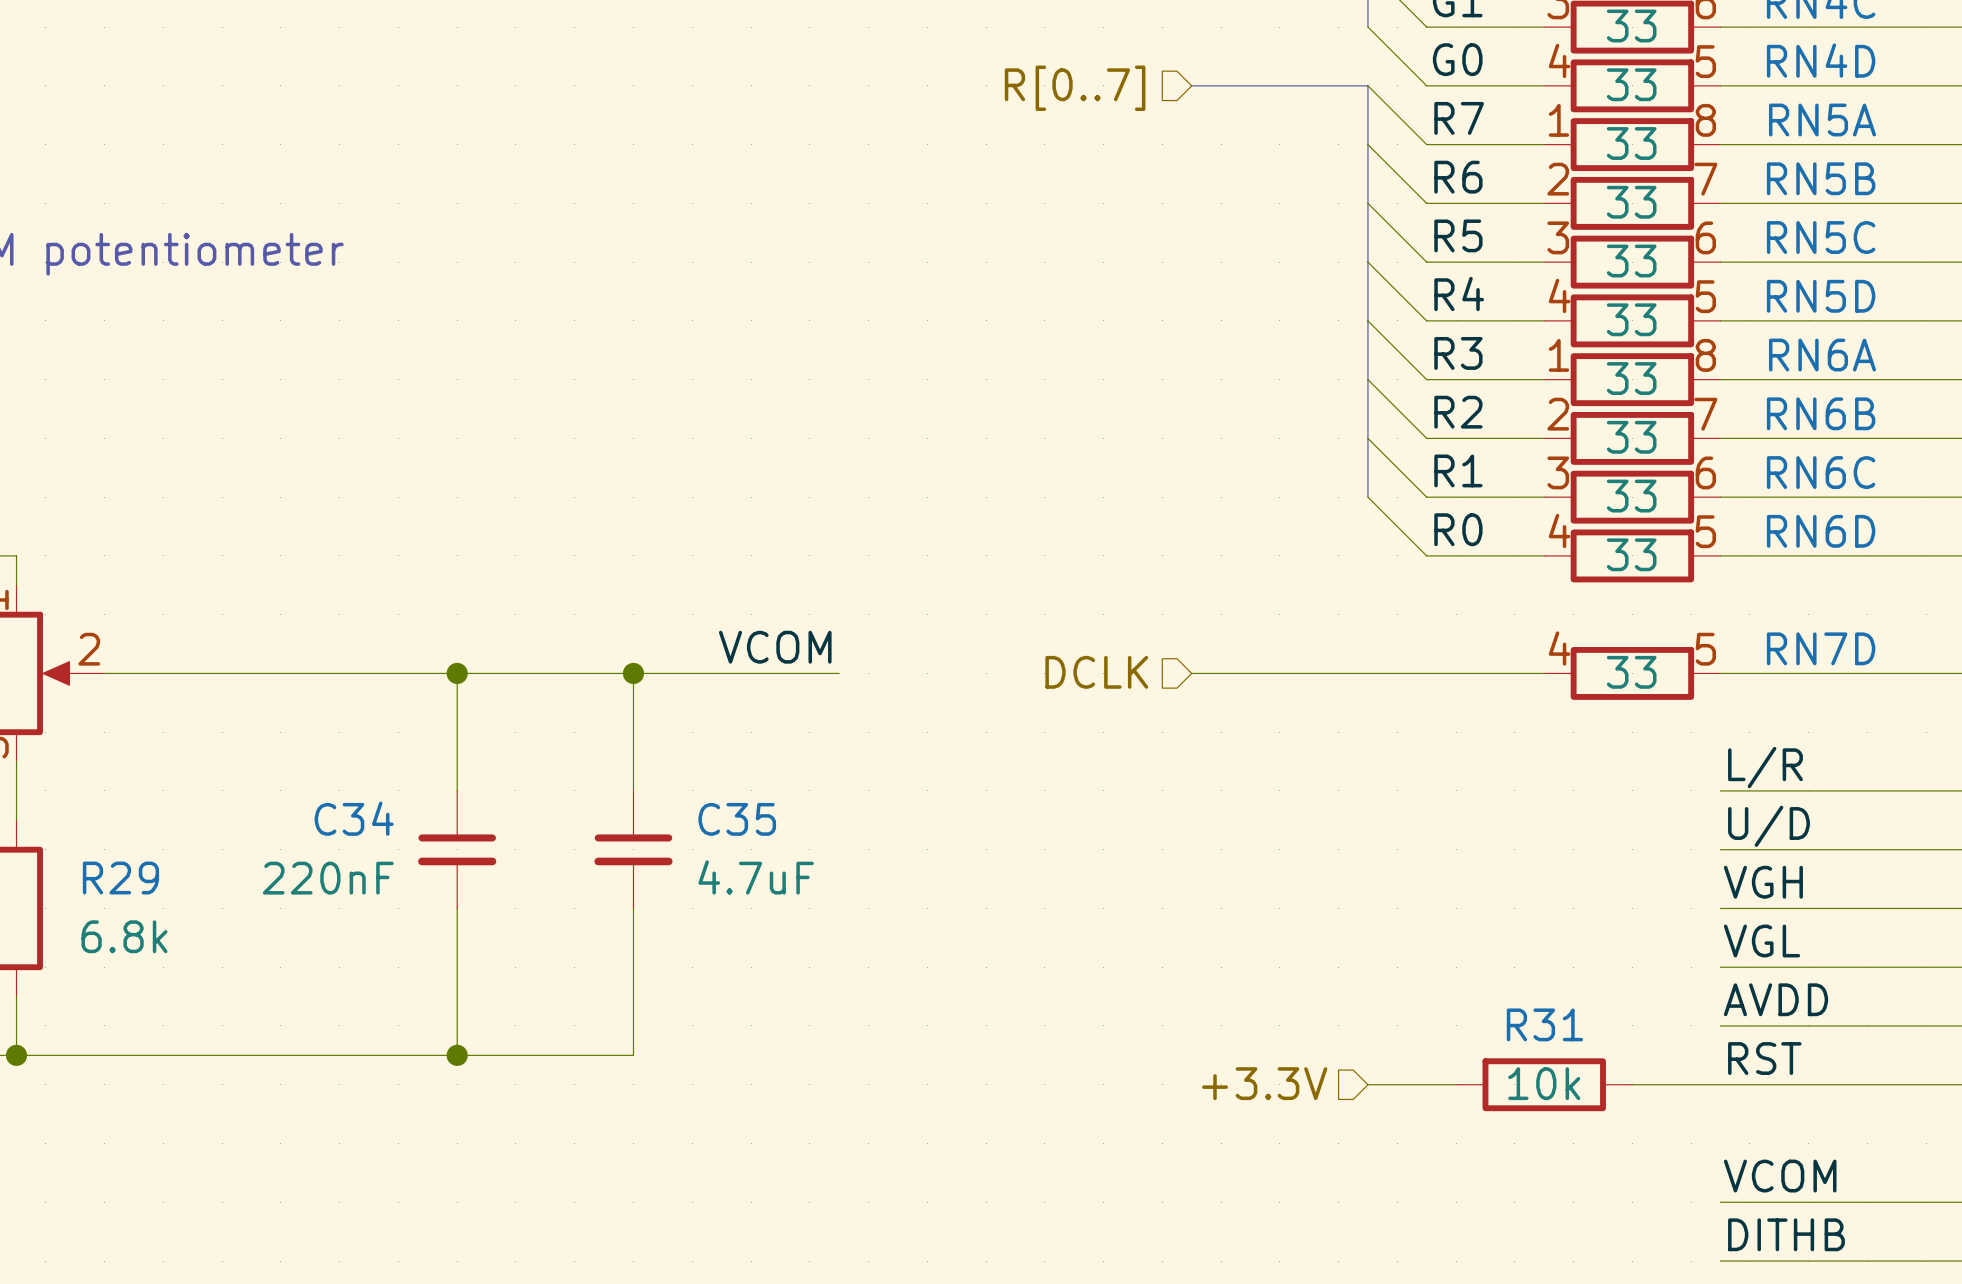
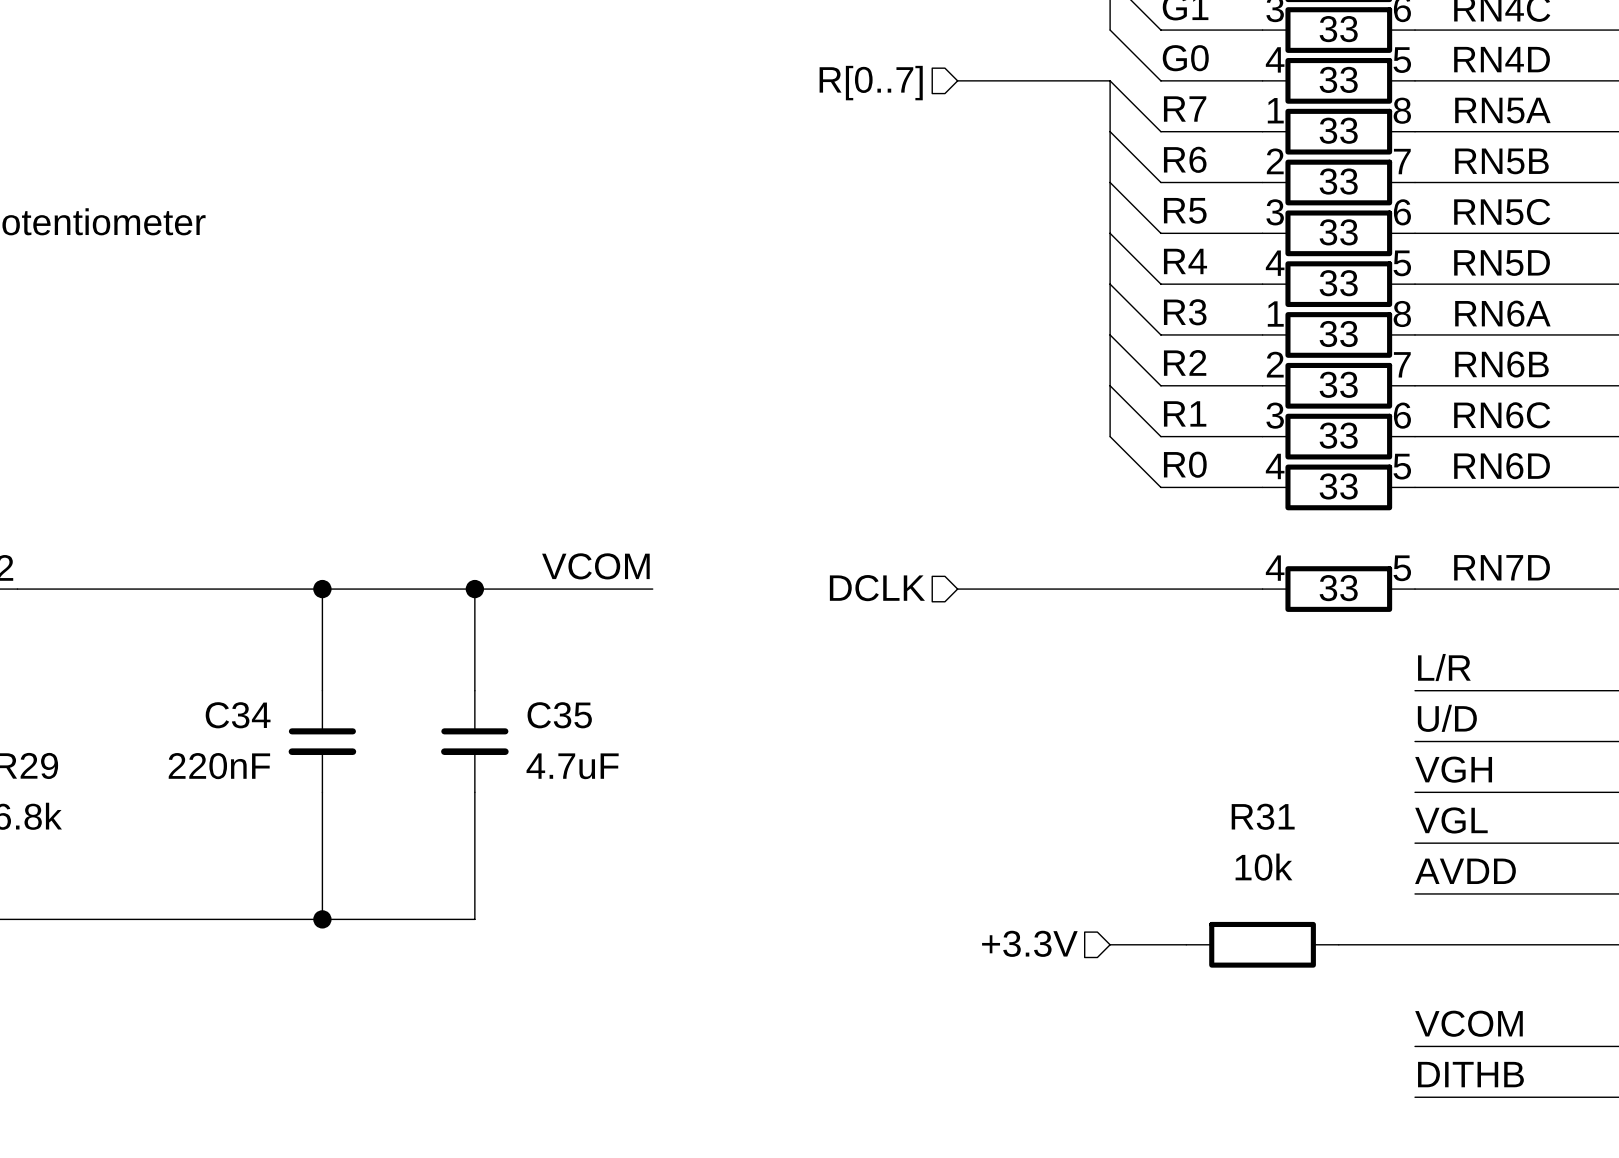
R31 name position: R31 (1544, 1024) -> R31 (1263, 816)
label: RST (1764, 1058) -> none
R31 value position: 10k (1544, 1083) -> 10k (1263, 867)

